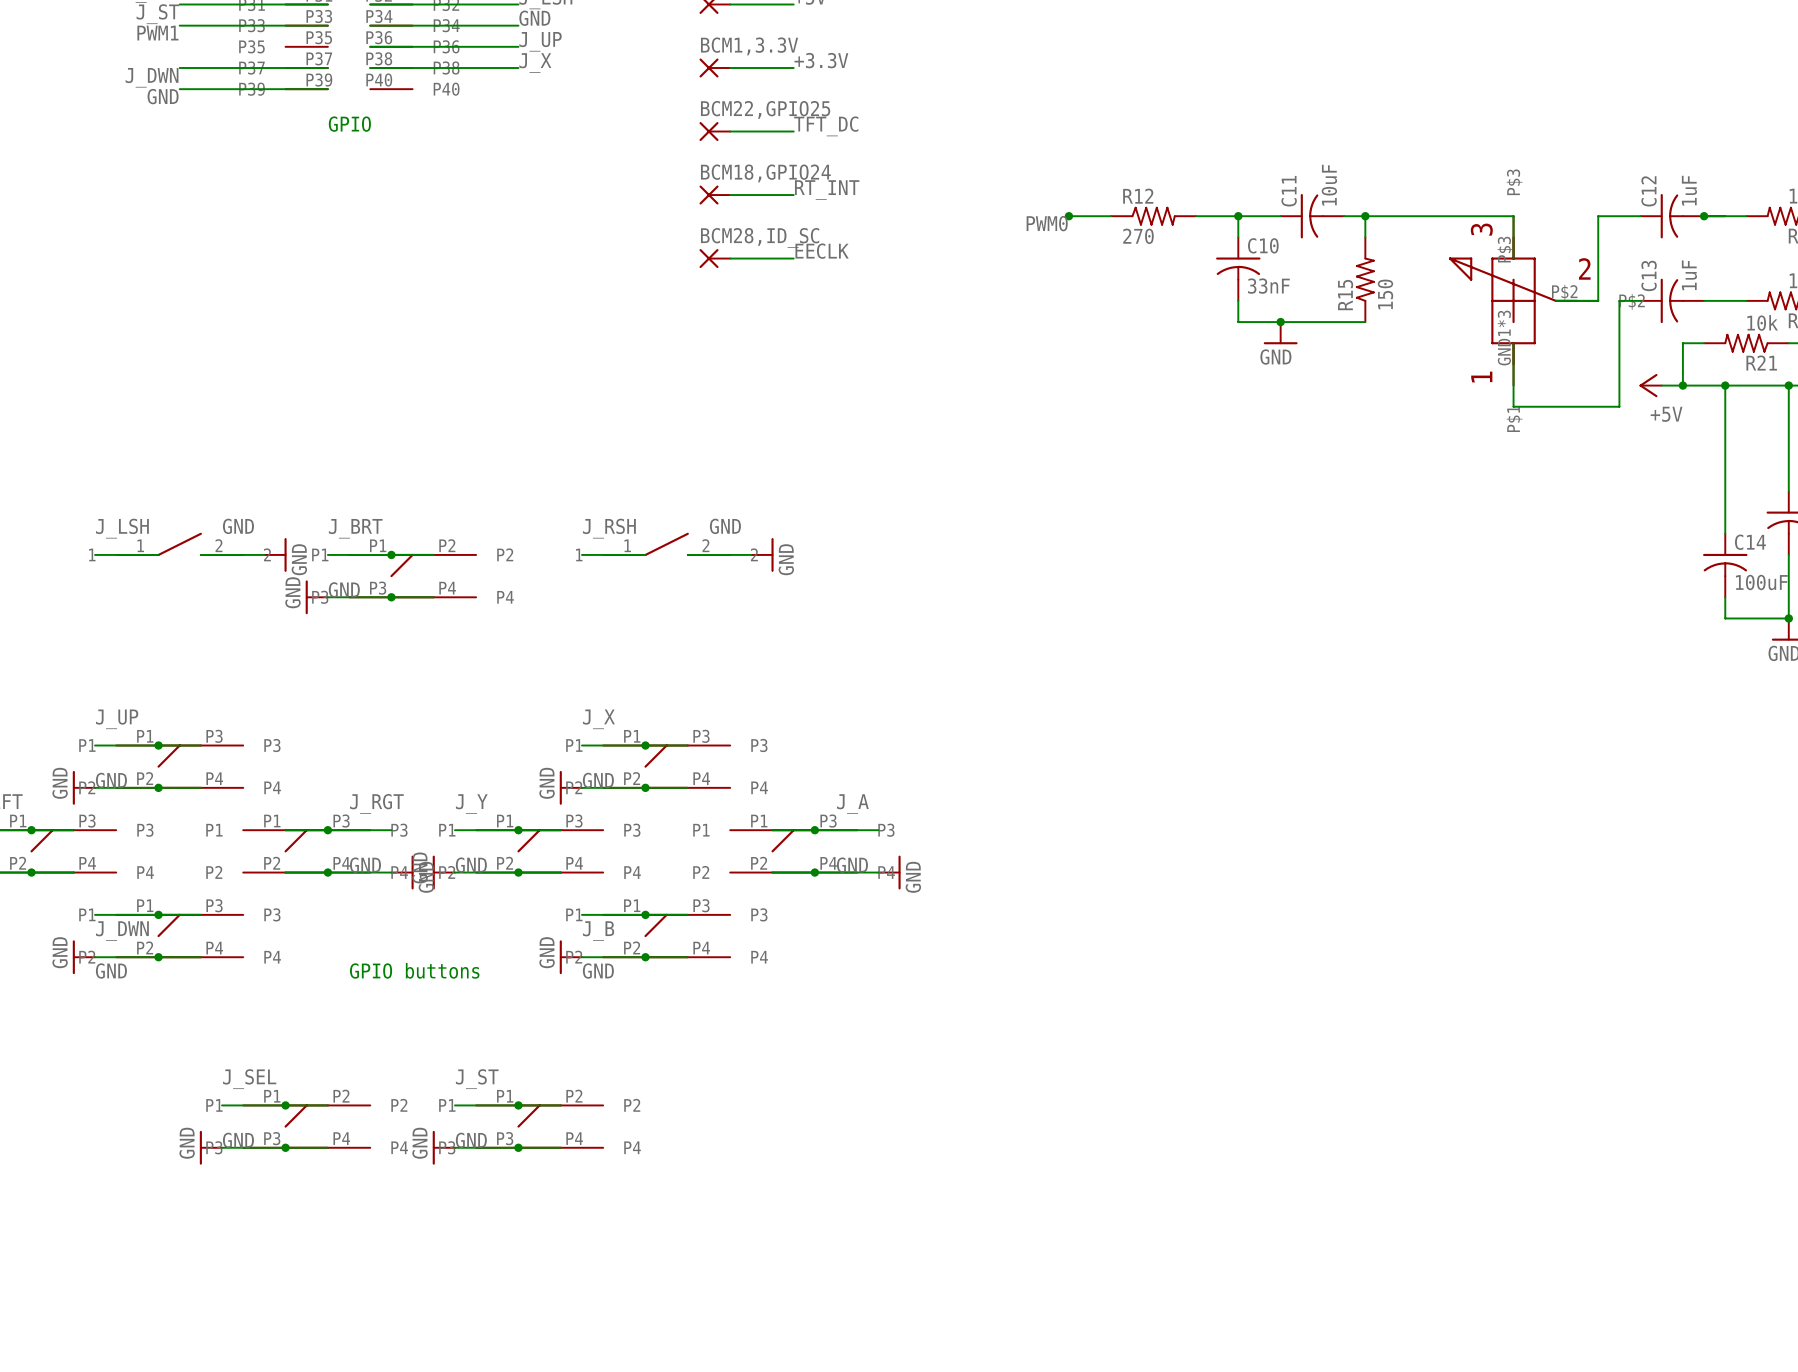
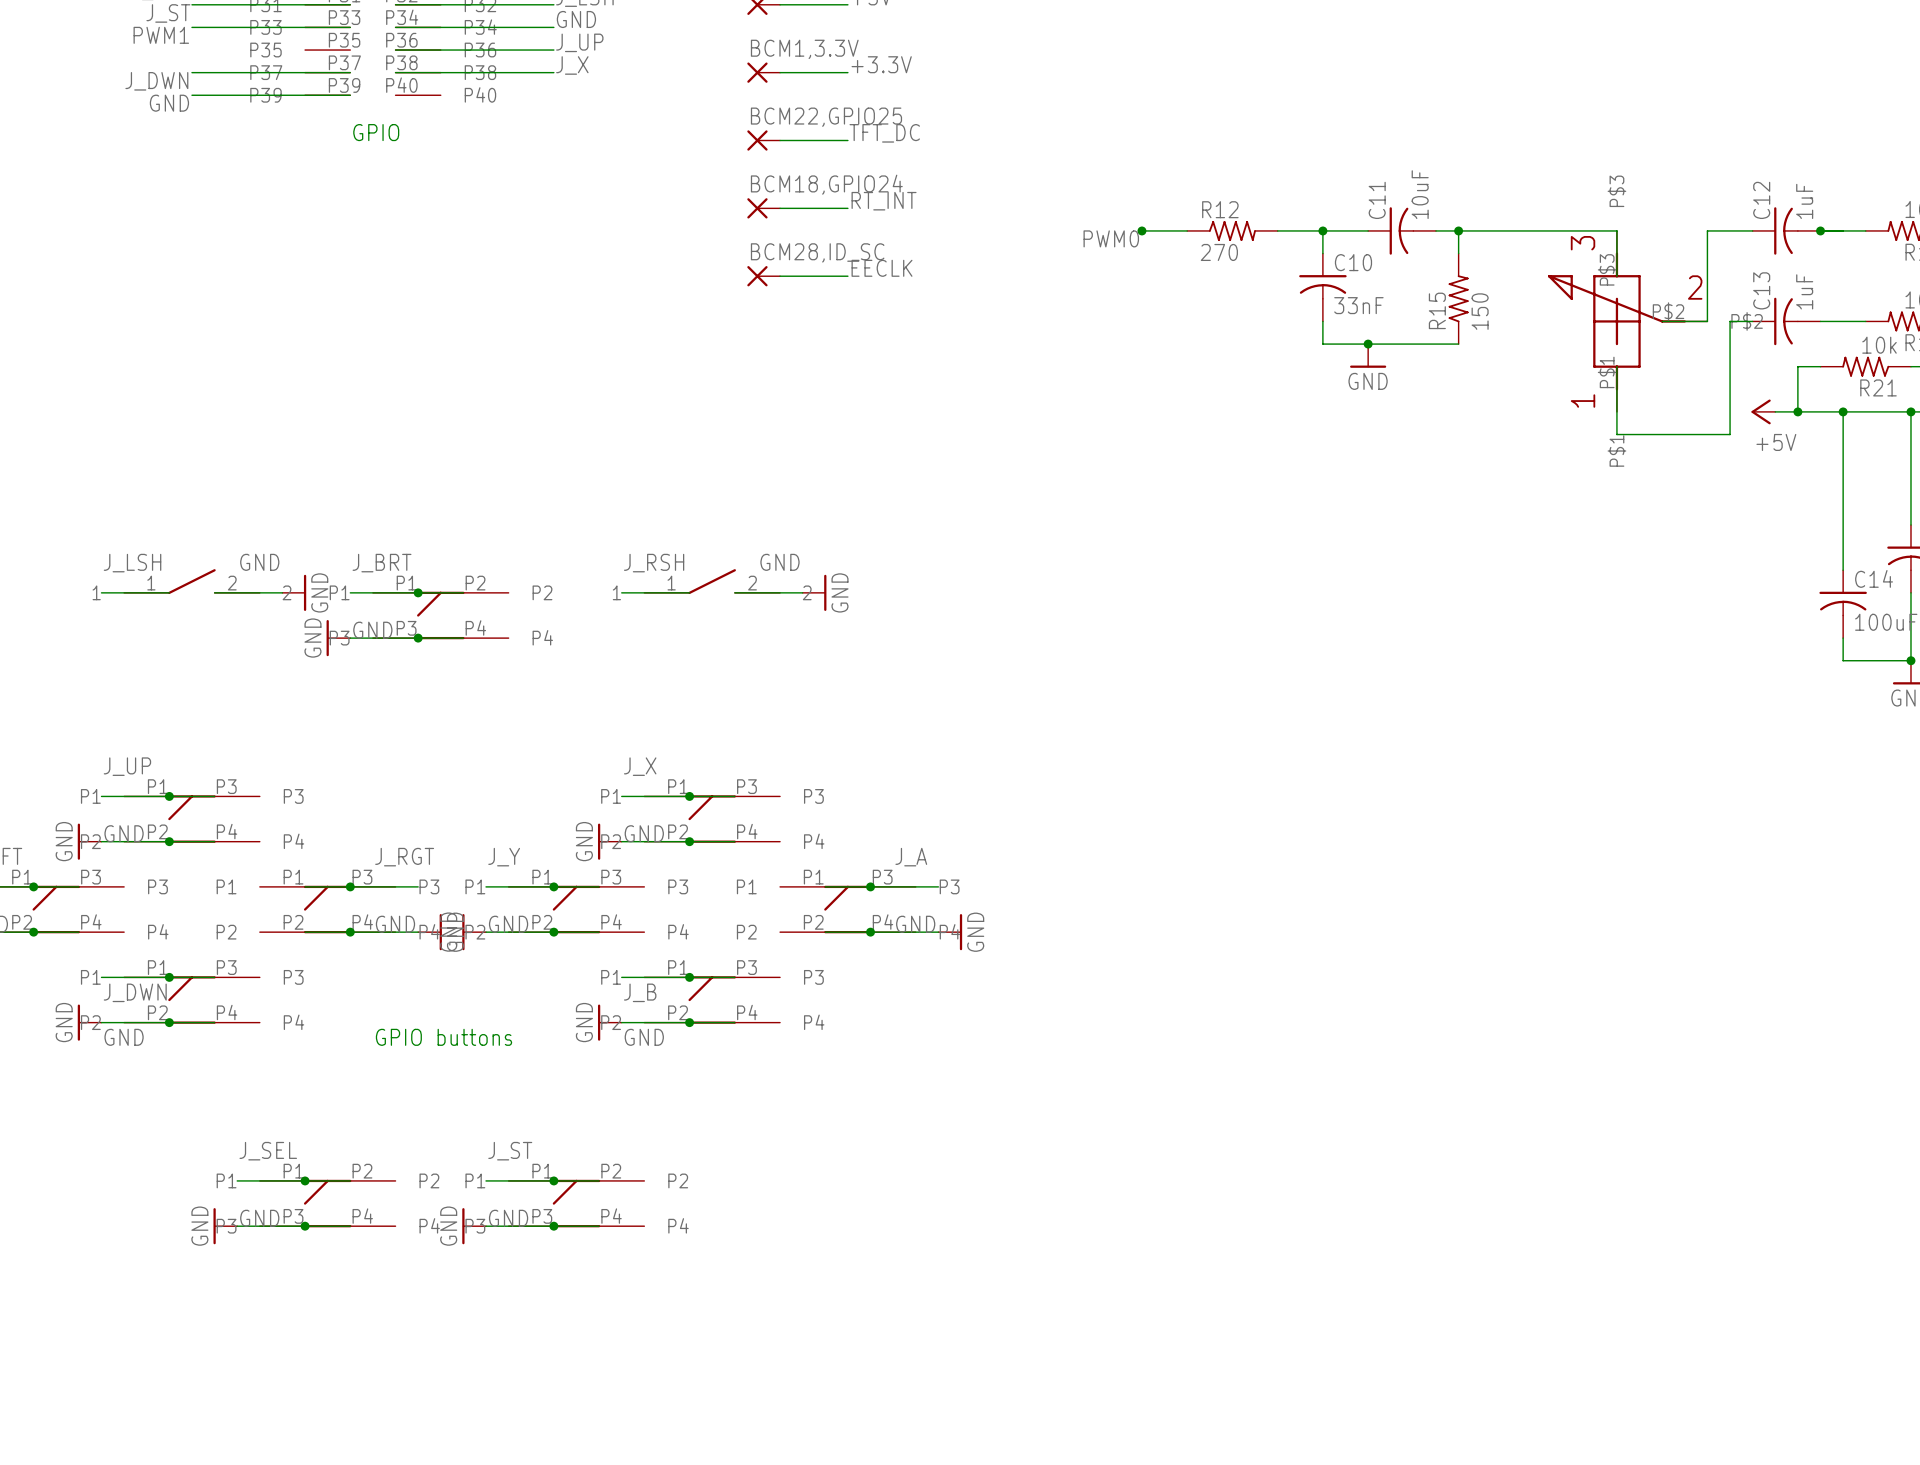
part pin number: GND1*3 (1504, 338) -> P$1 (1607, 372)

